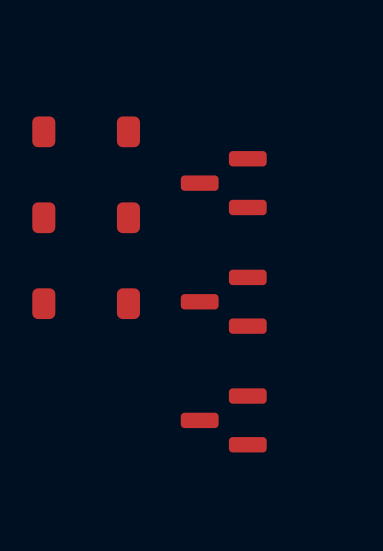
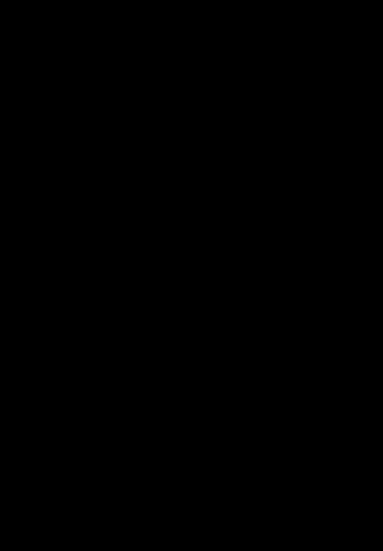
part: (86, 131) -> none
part: (223, 183) -> none
part: (86, 217) -> none
part: (223, 301) -> none
part: (86, 303) -> none
part: (223, 420) -> none

